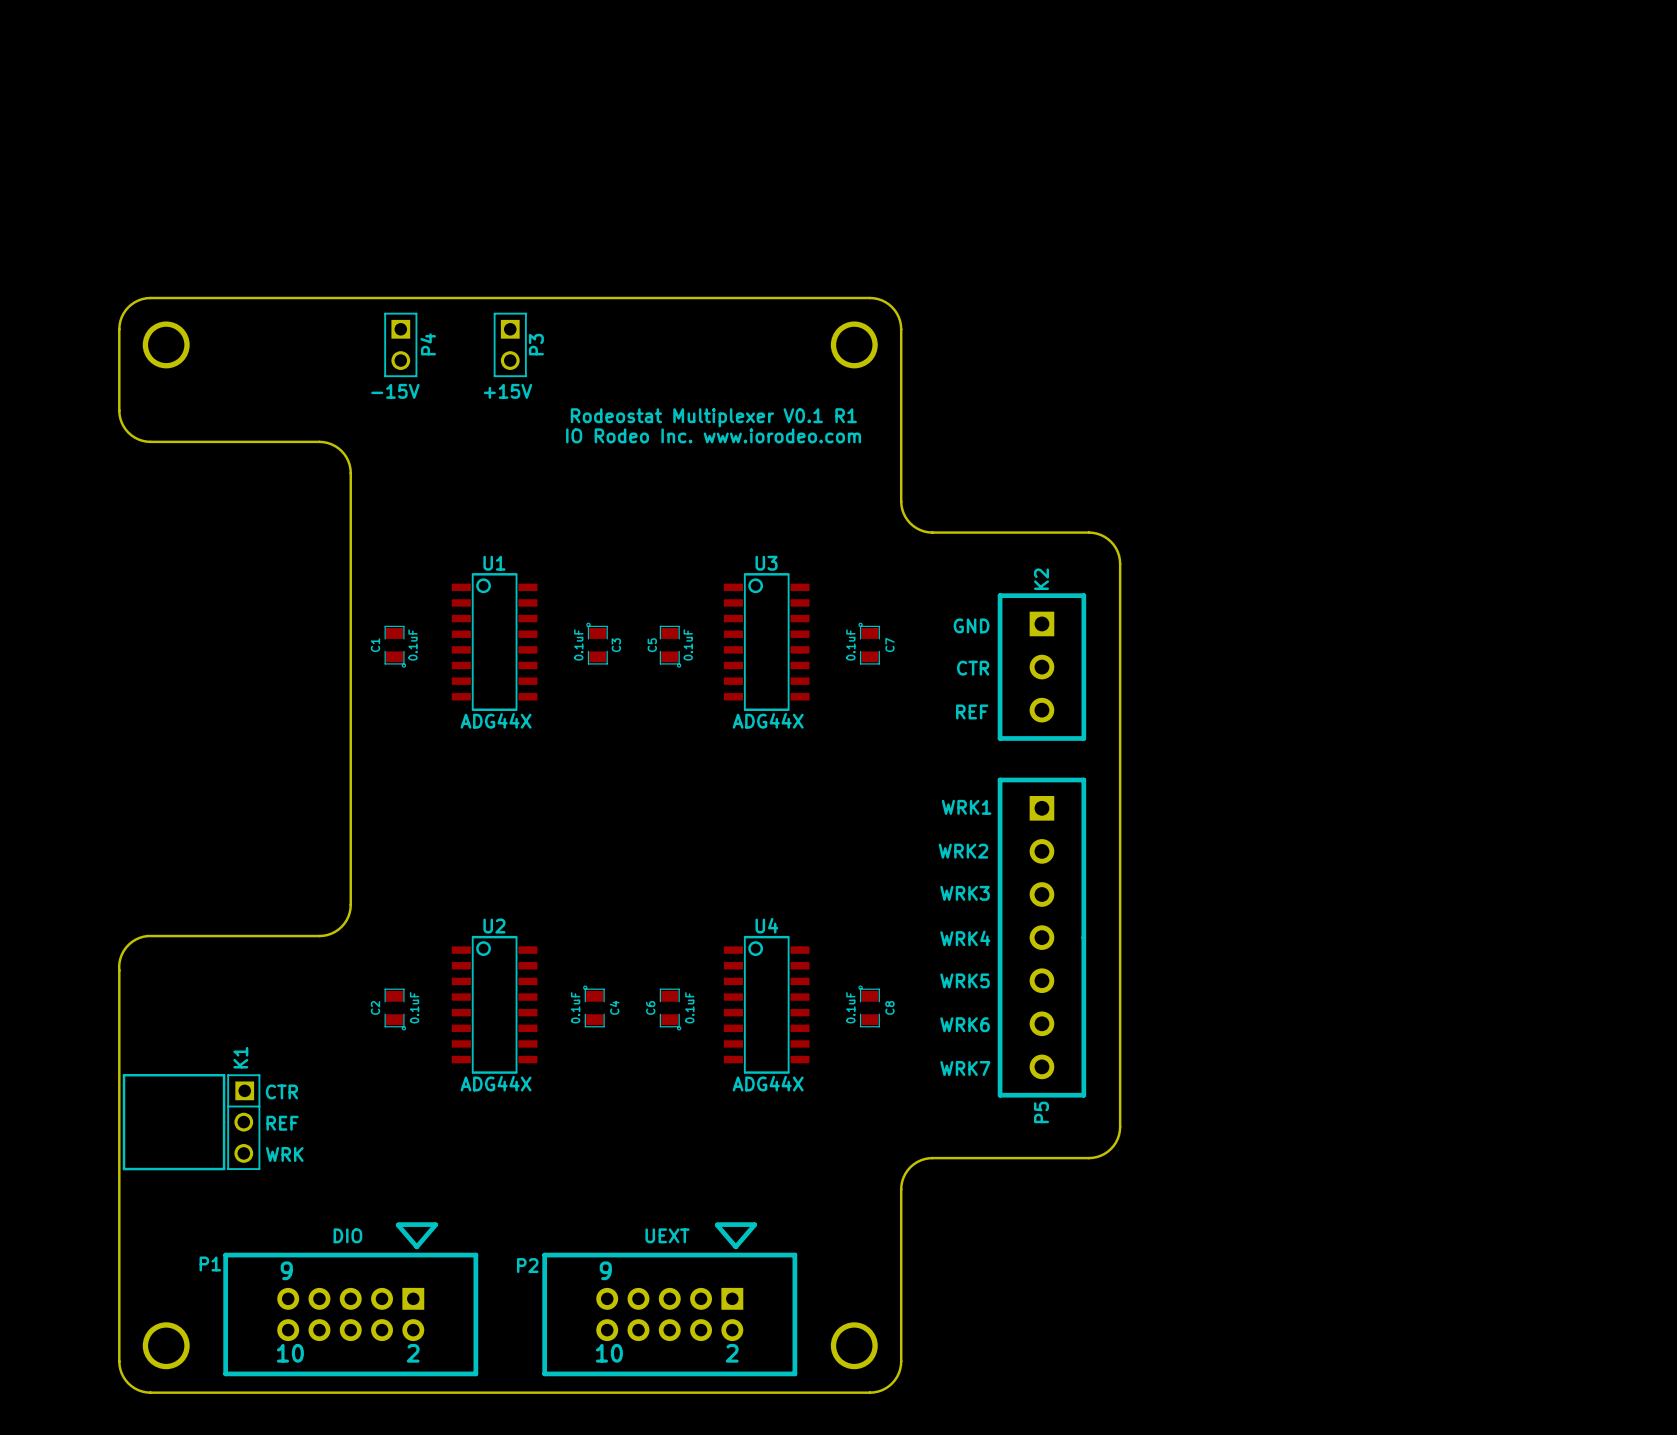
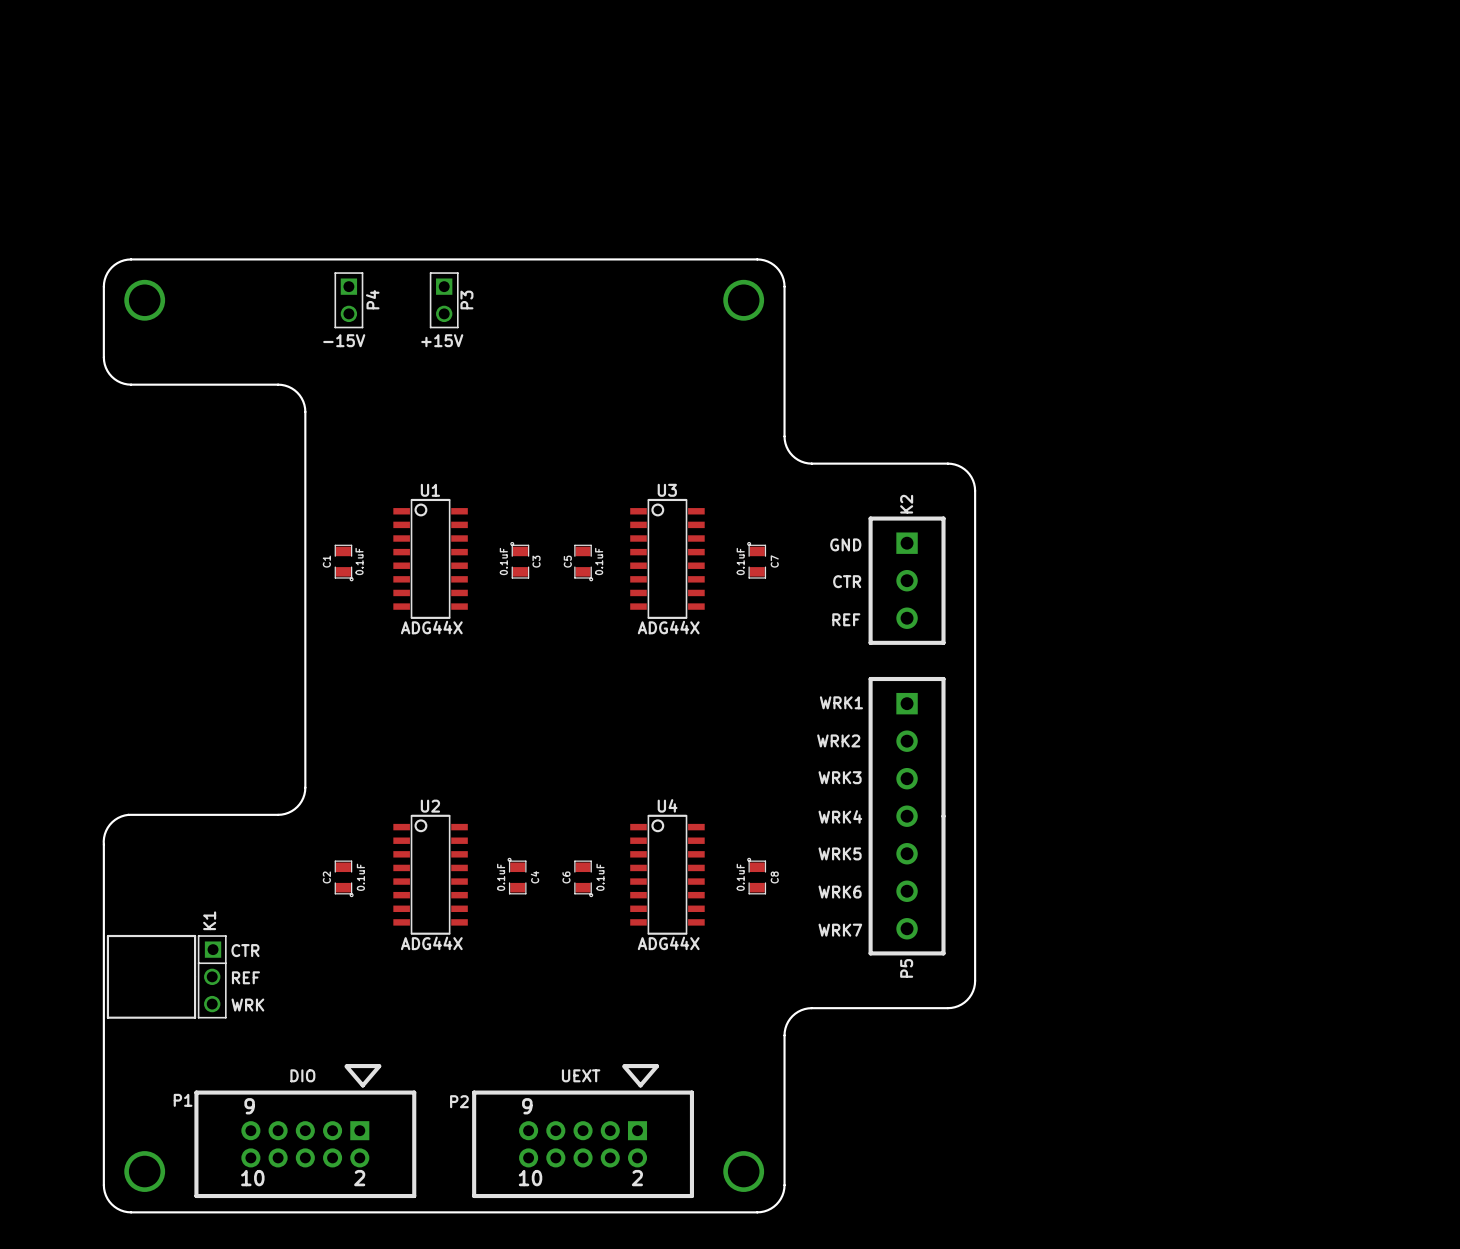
text: Rodeostat Multiplexer V0.1 R1 (713, 417) -> none
text: IO Rodeo Inc. www.iorodeo.com (713, 435) -> none

